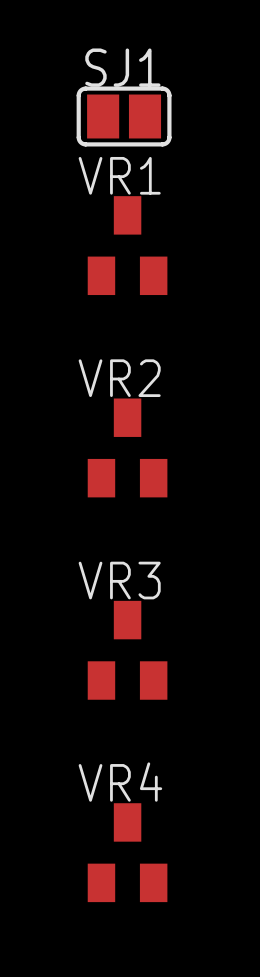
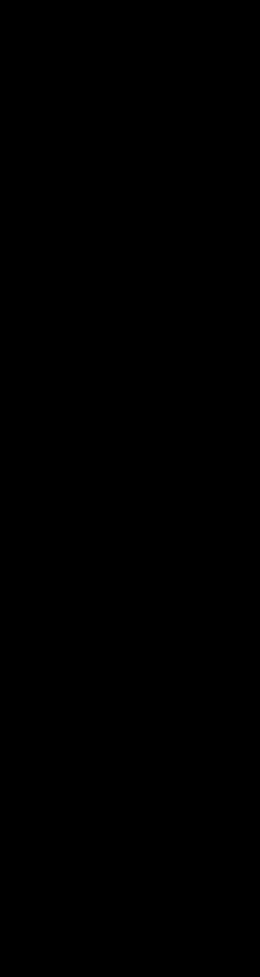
SJ1: (124, 116) -> none
VR1: (127, 245) -> none
VR2: (127, 447) -> none
VR3: (127, 650) -> none
VR4: (127, 852) -> none

